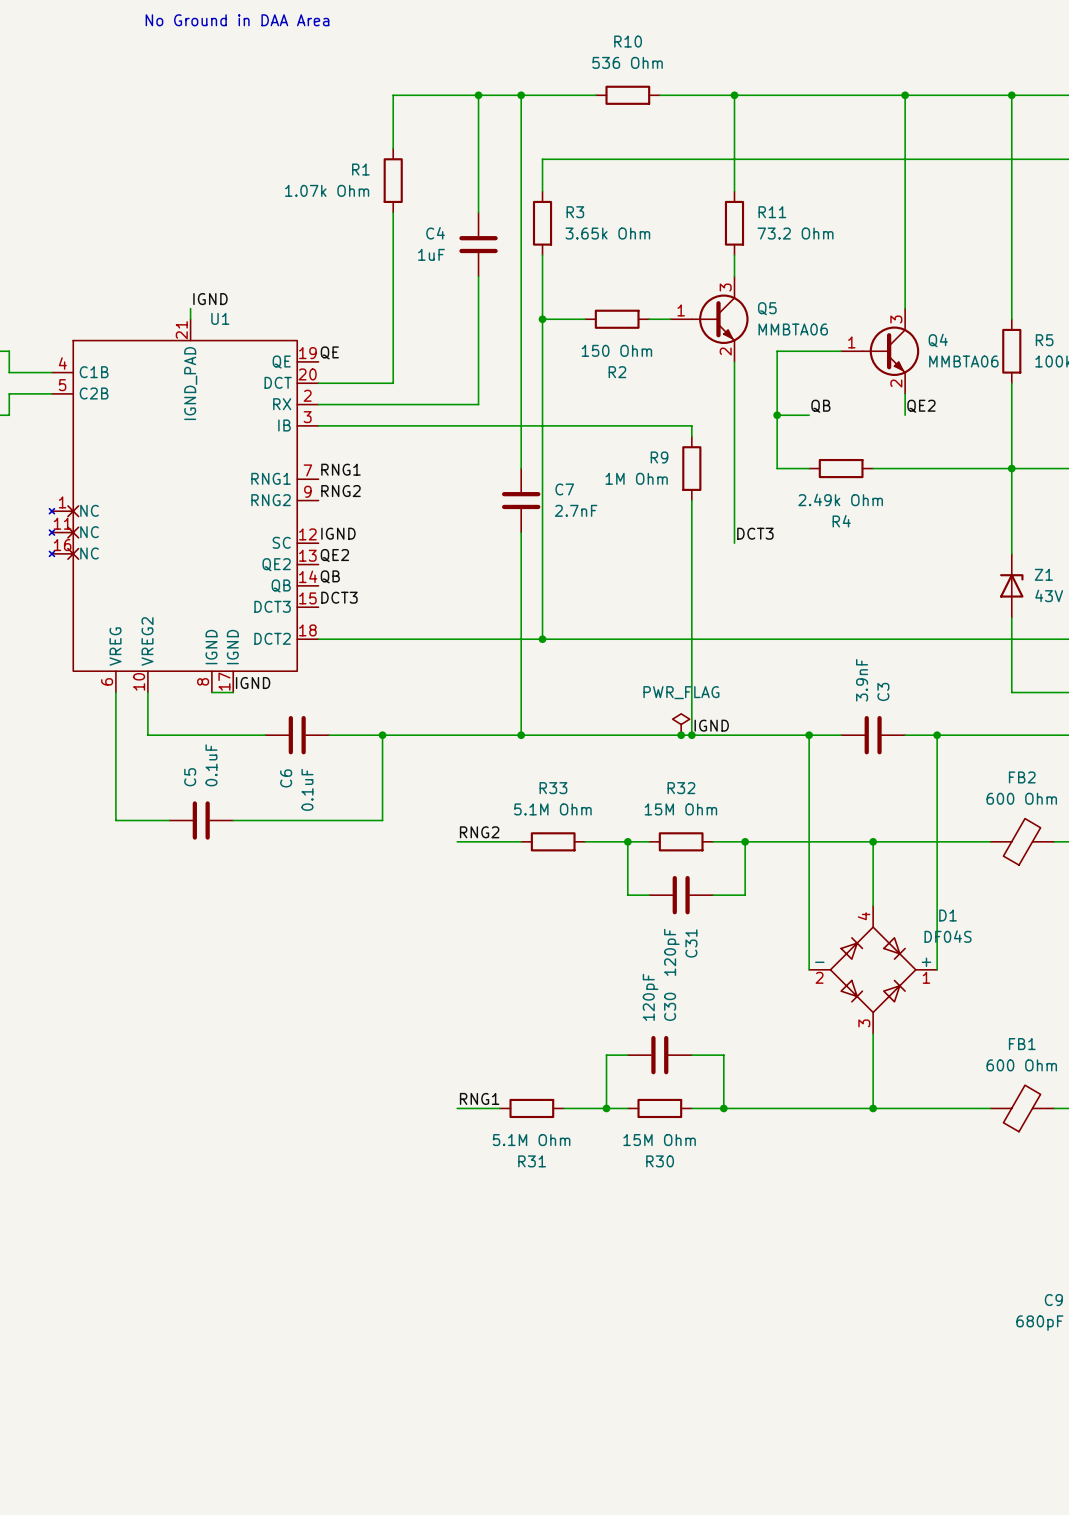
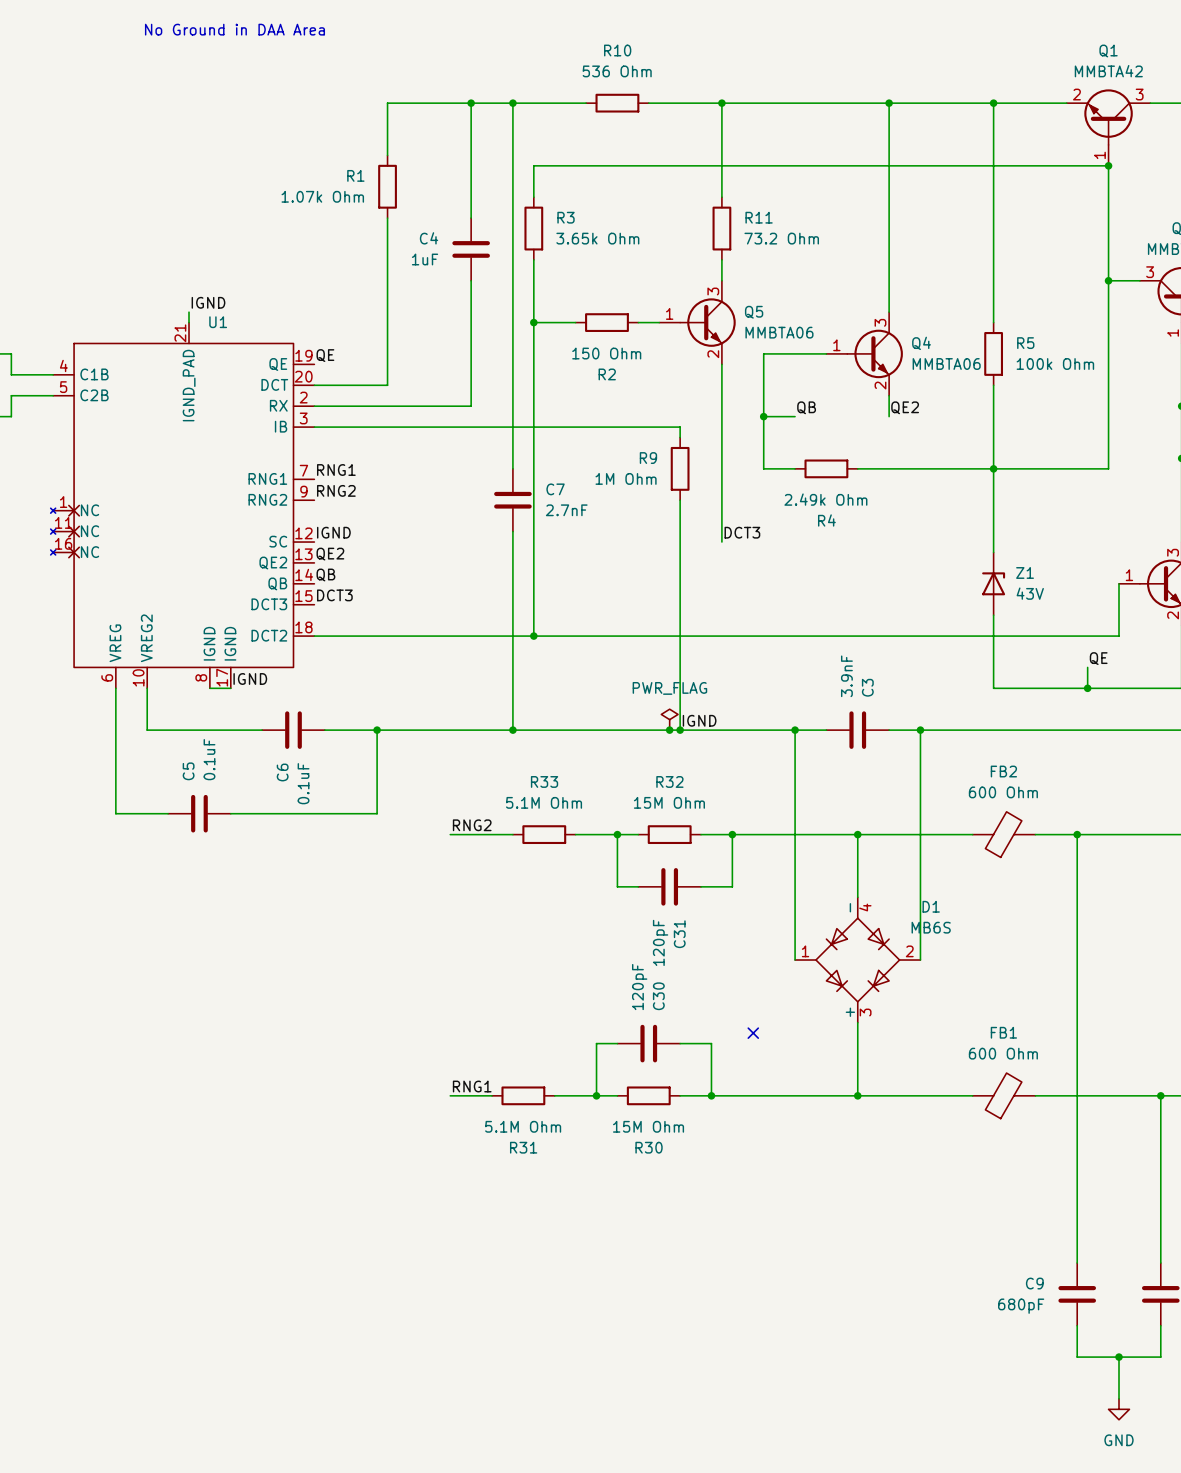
D1 symbol: [809, 905, 938, 1034] -> [795, 897, 921, 1023]
D1 value: DF04S (948, 936) -> MB6S (931, 927)
no-connect mark: none -> (753, 1033)

